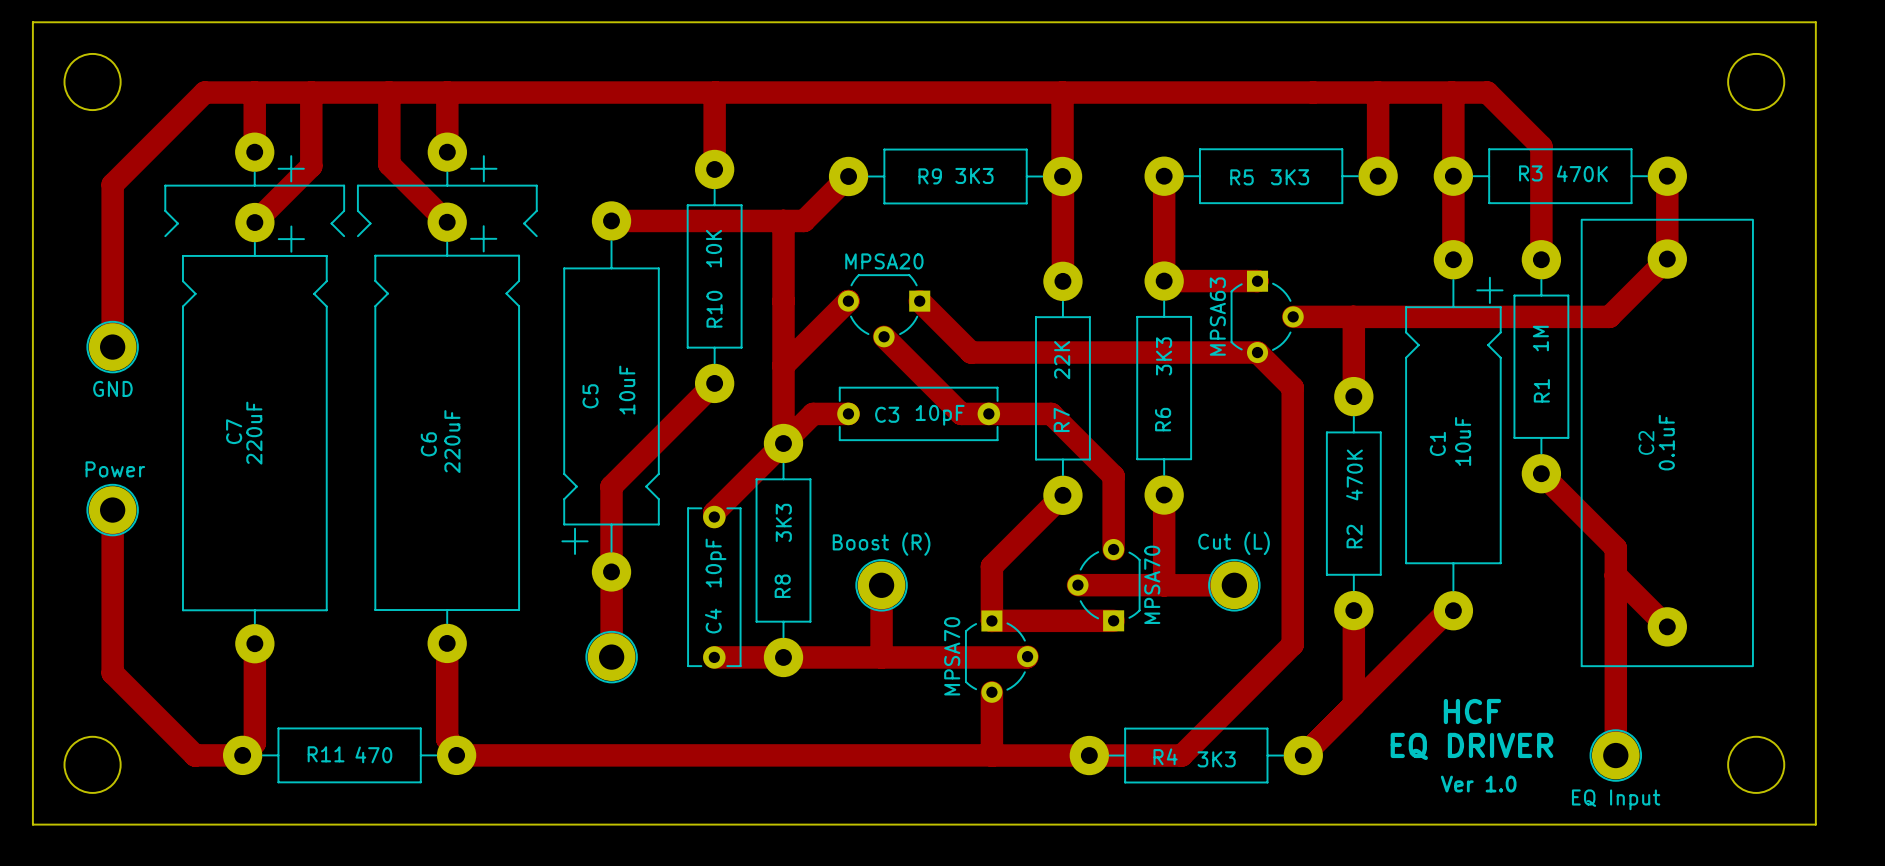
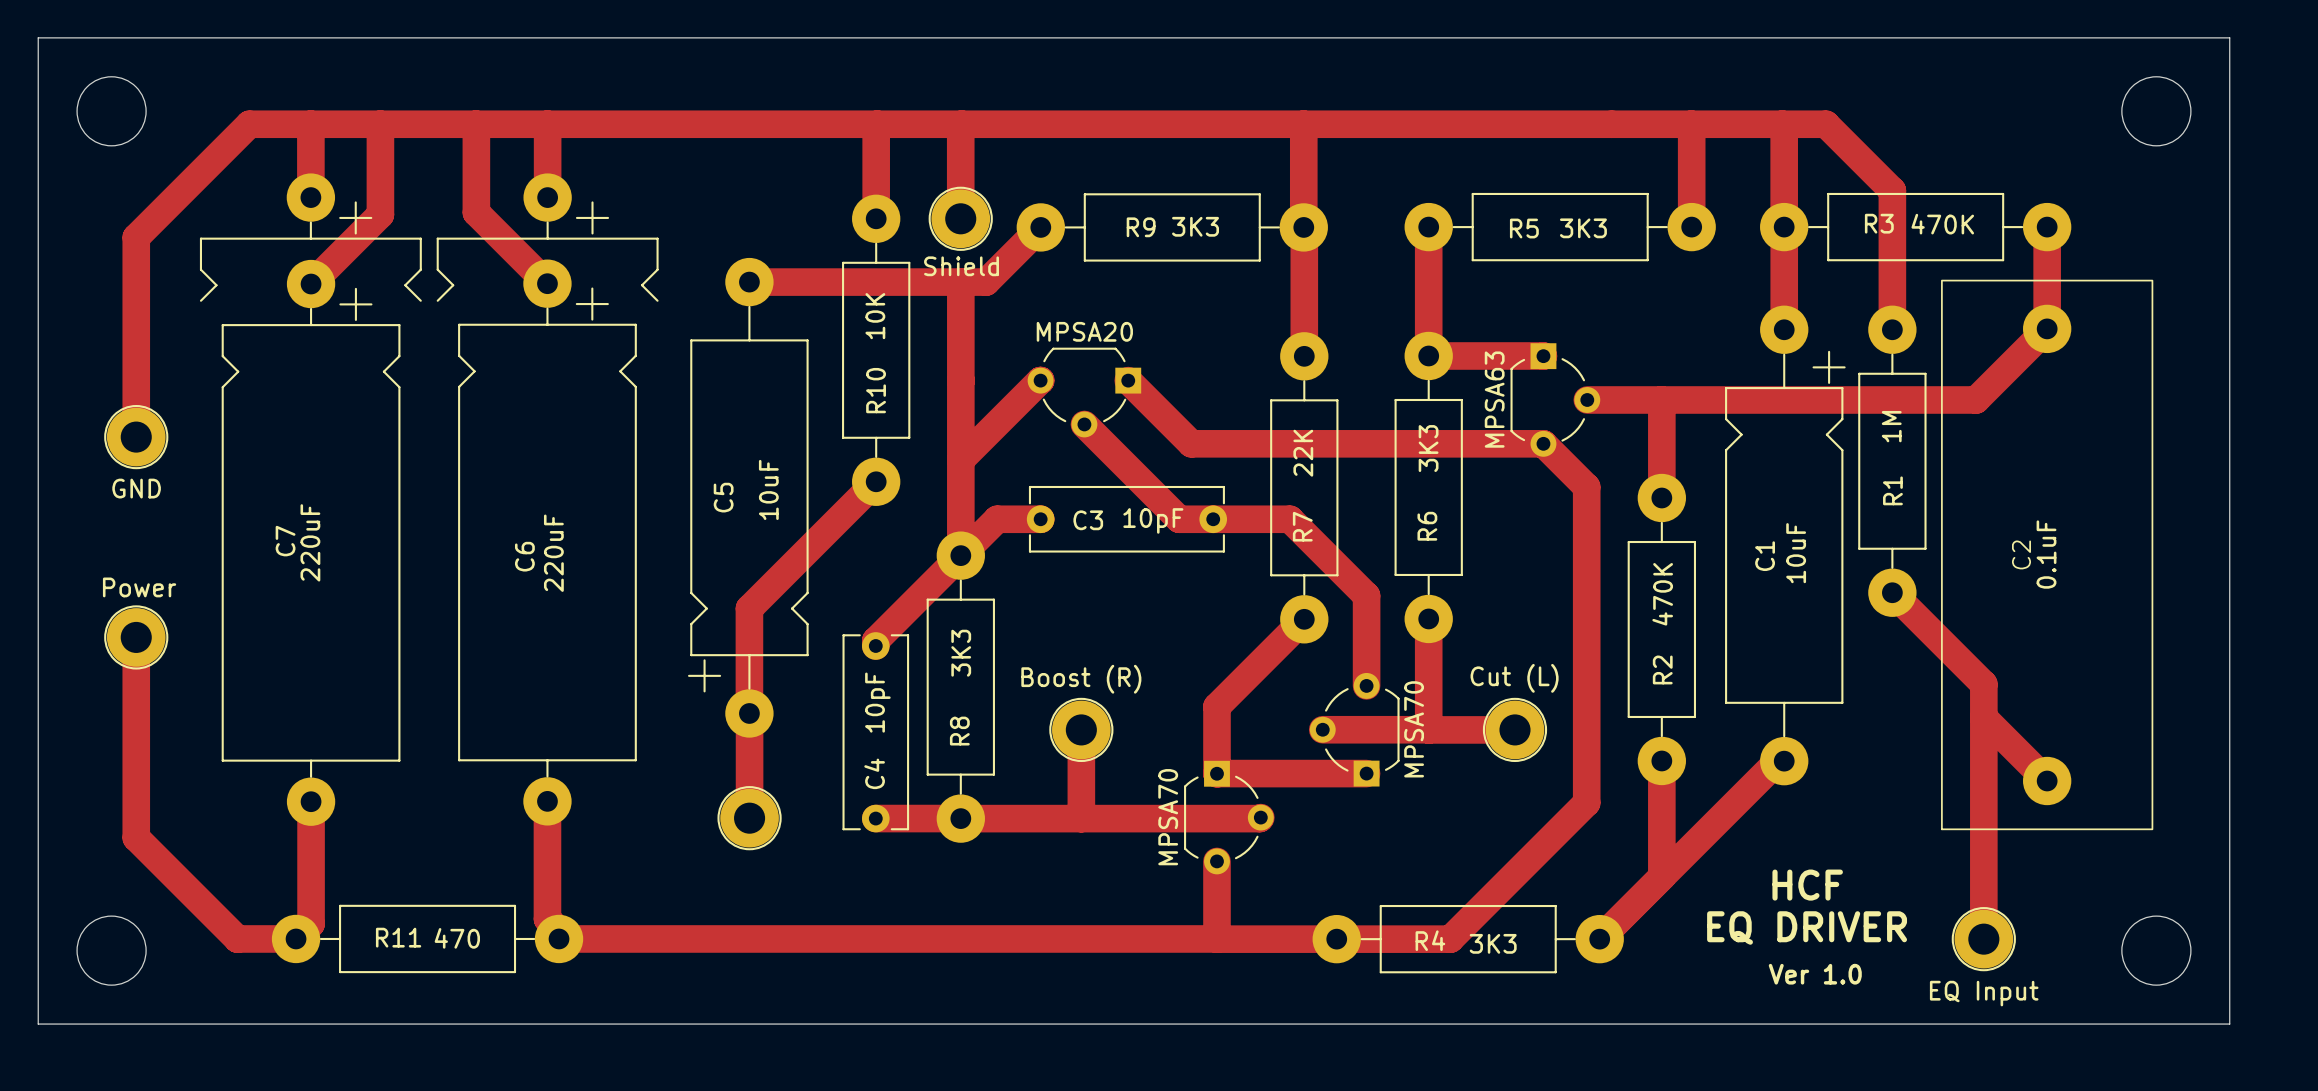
track: none -> (961, 124) (960, 218)
part: none -> Shield (960, 218)

